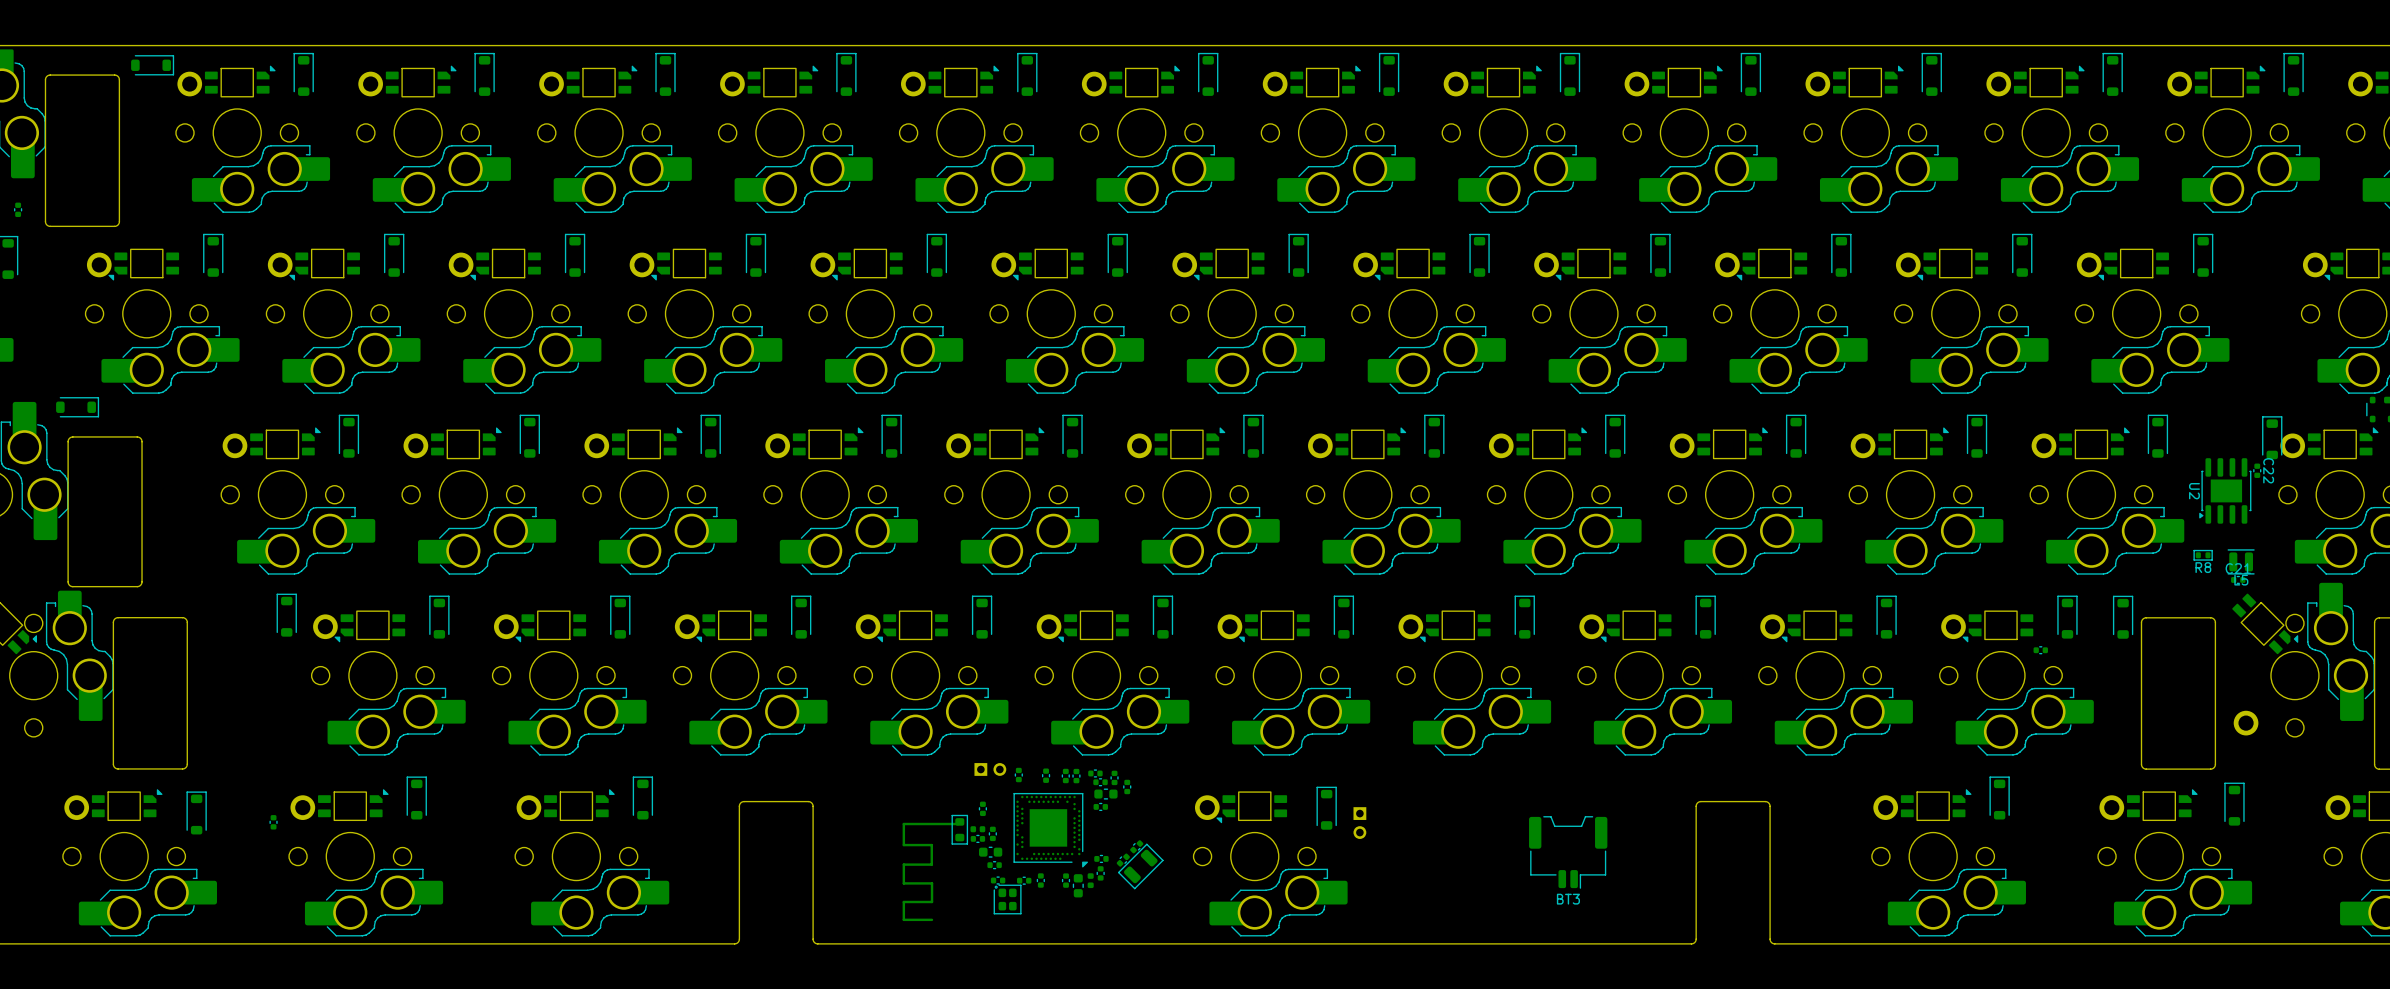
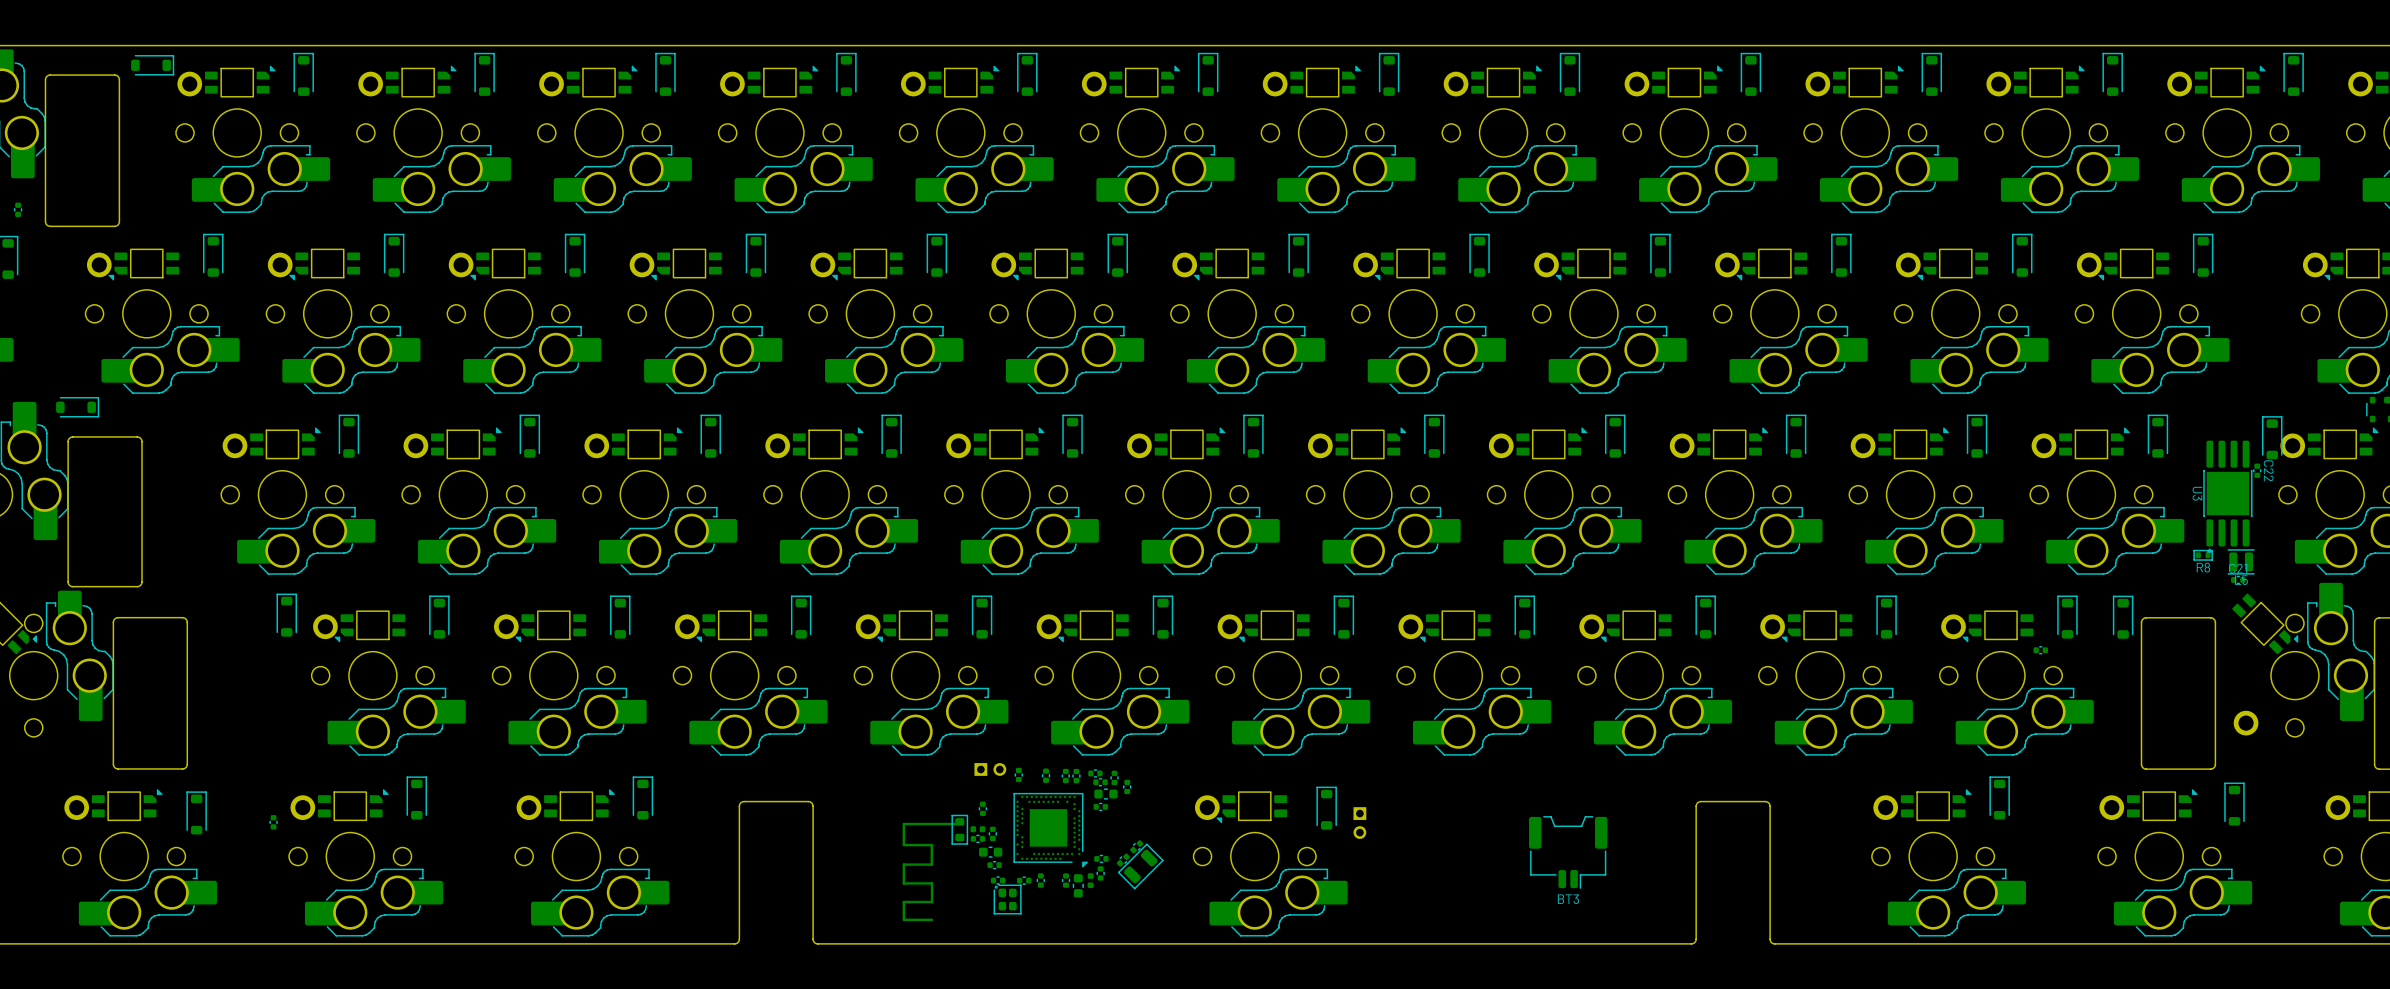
U2: (2225, 490) -> none
U3: none -> (2227, 496)

